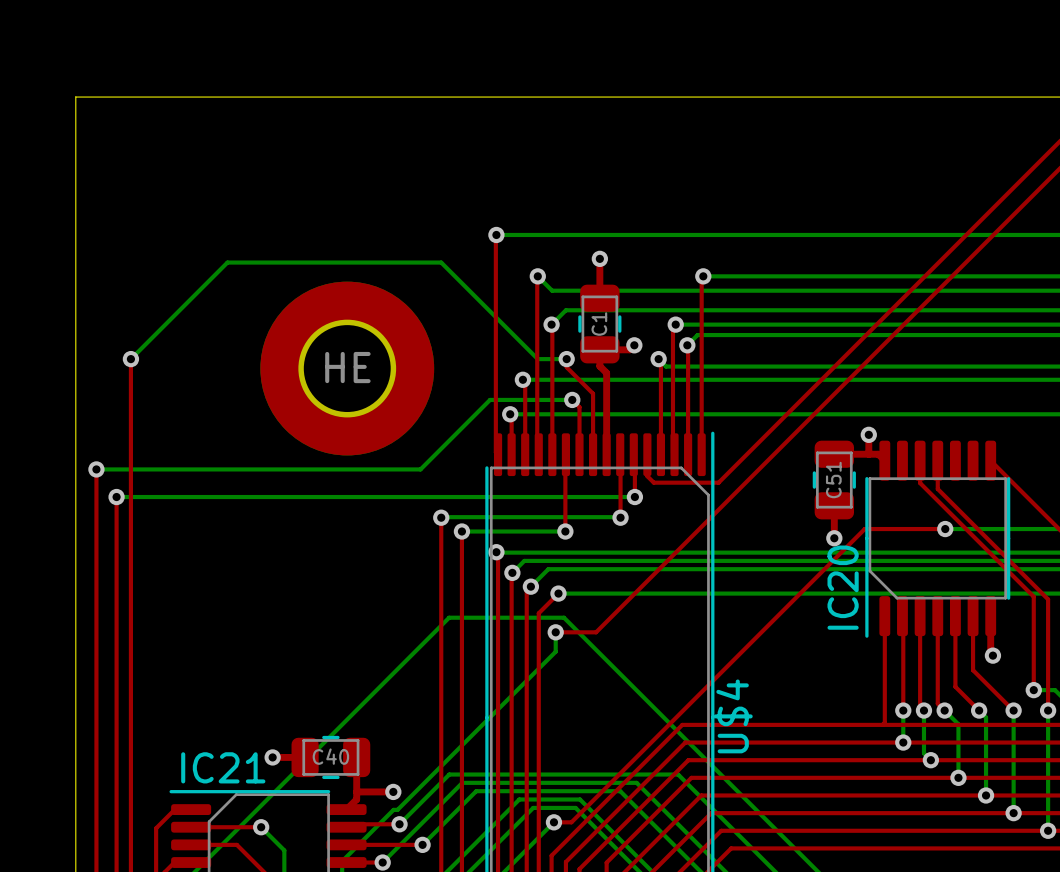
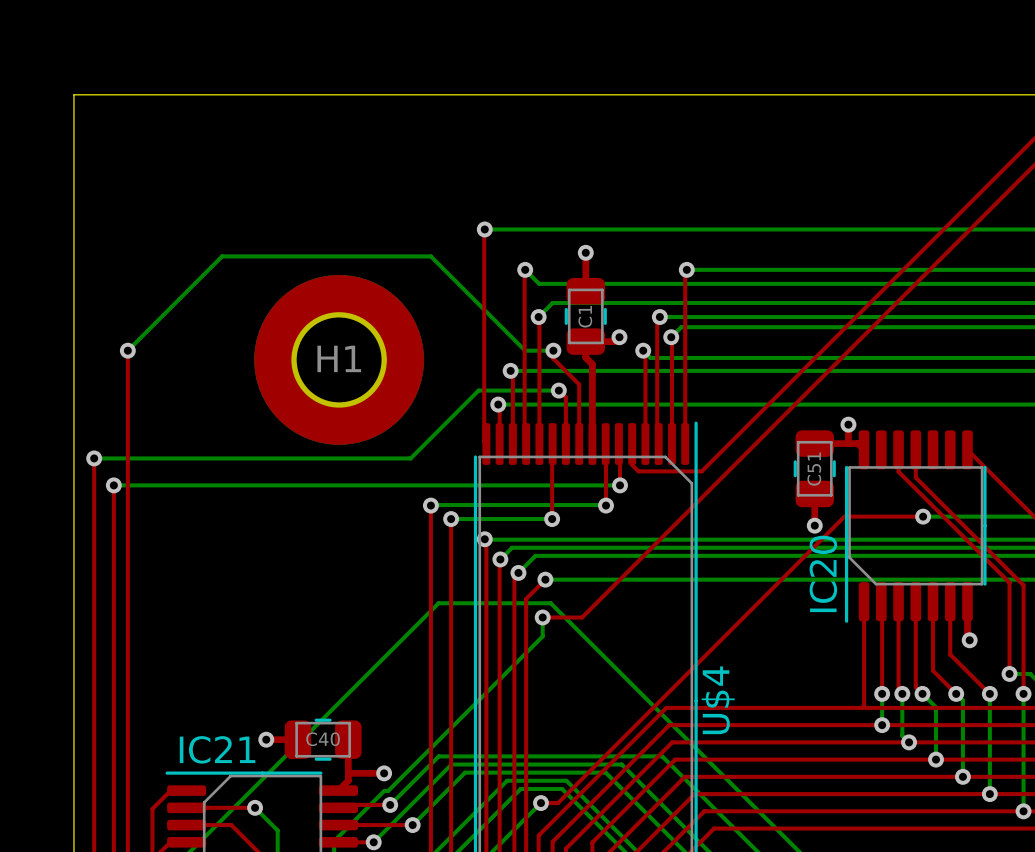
HE name: HE (347, 367) -> H1 (339, 358)

